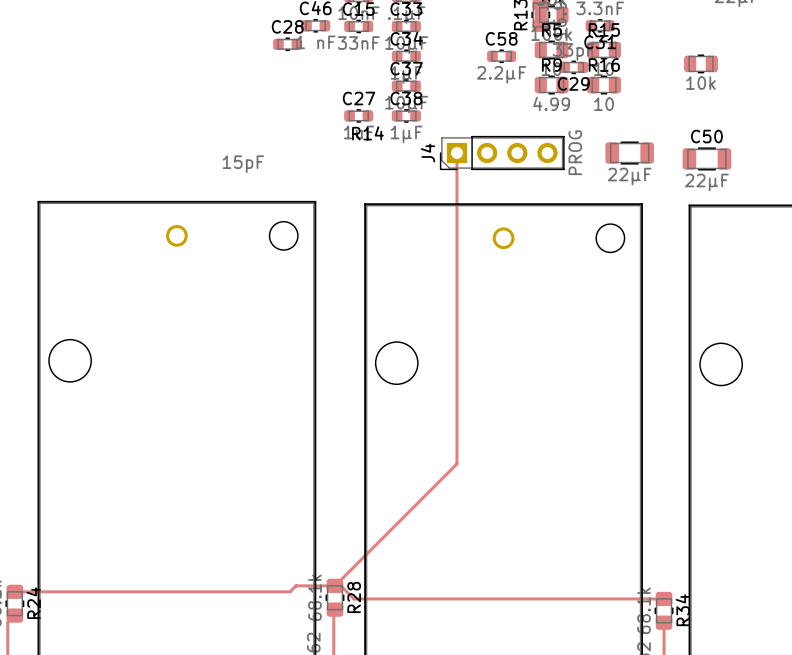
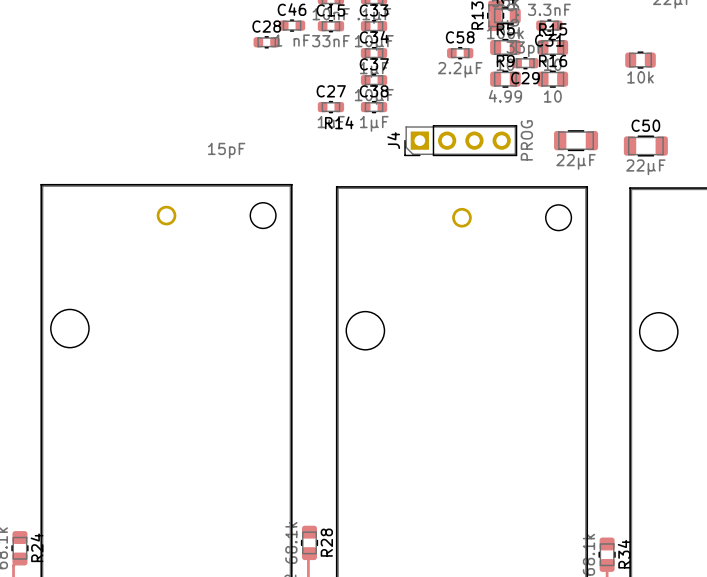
top track: (456, 153) (456, 463) (335, 585) -> none
top track: (14, 591) (290, 591) (296, 585) (340, 585) (353, 598) (664, 598) -> none

